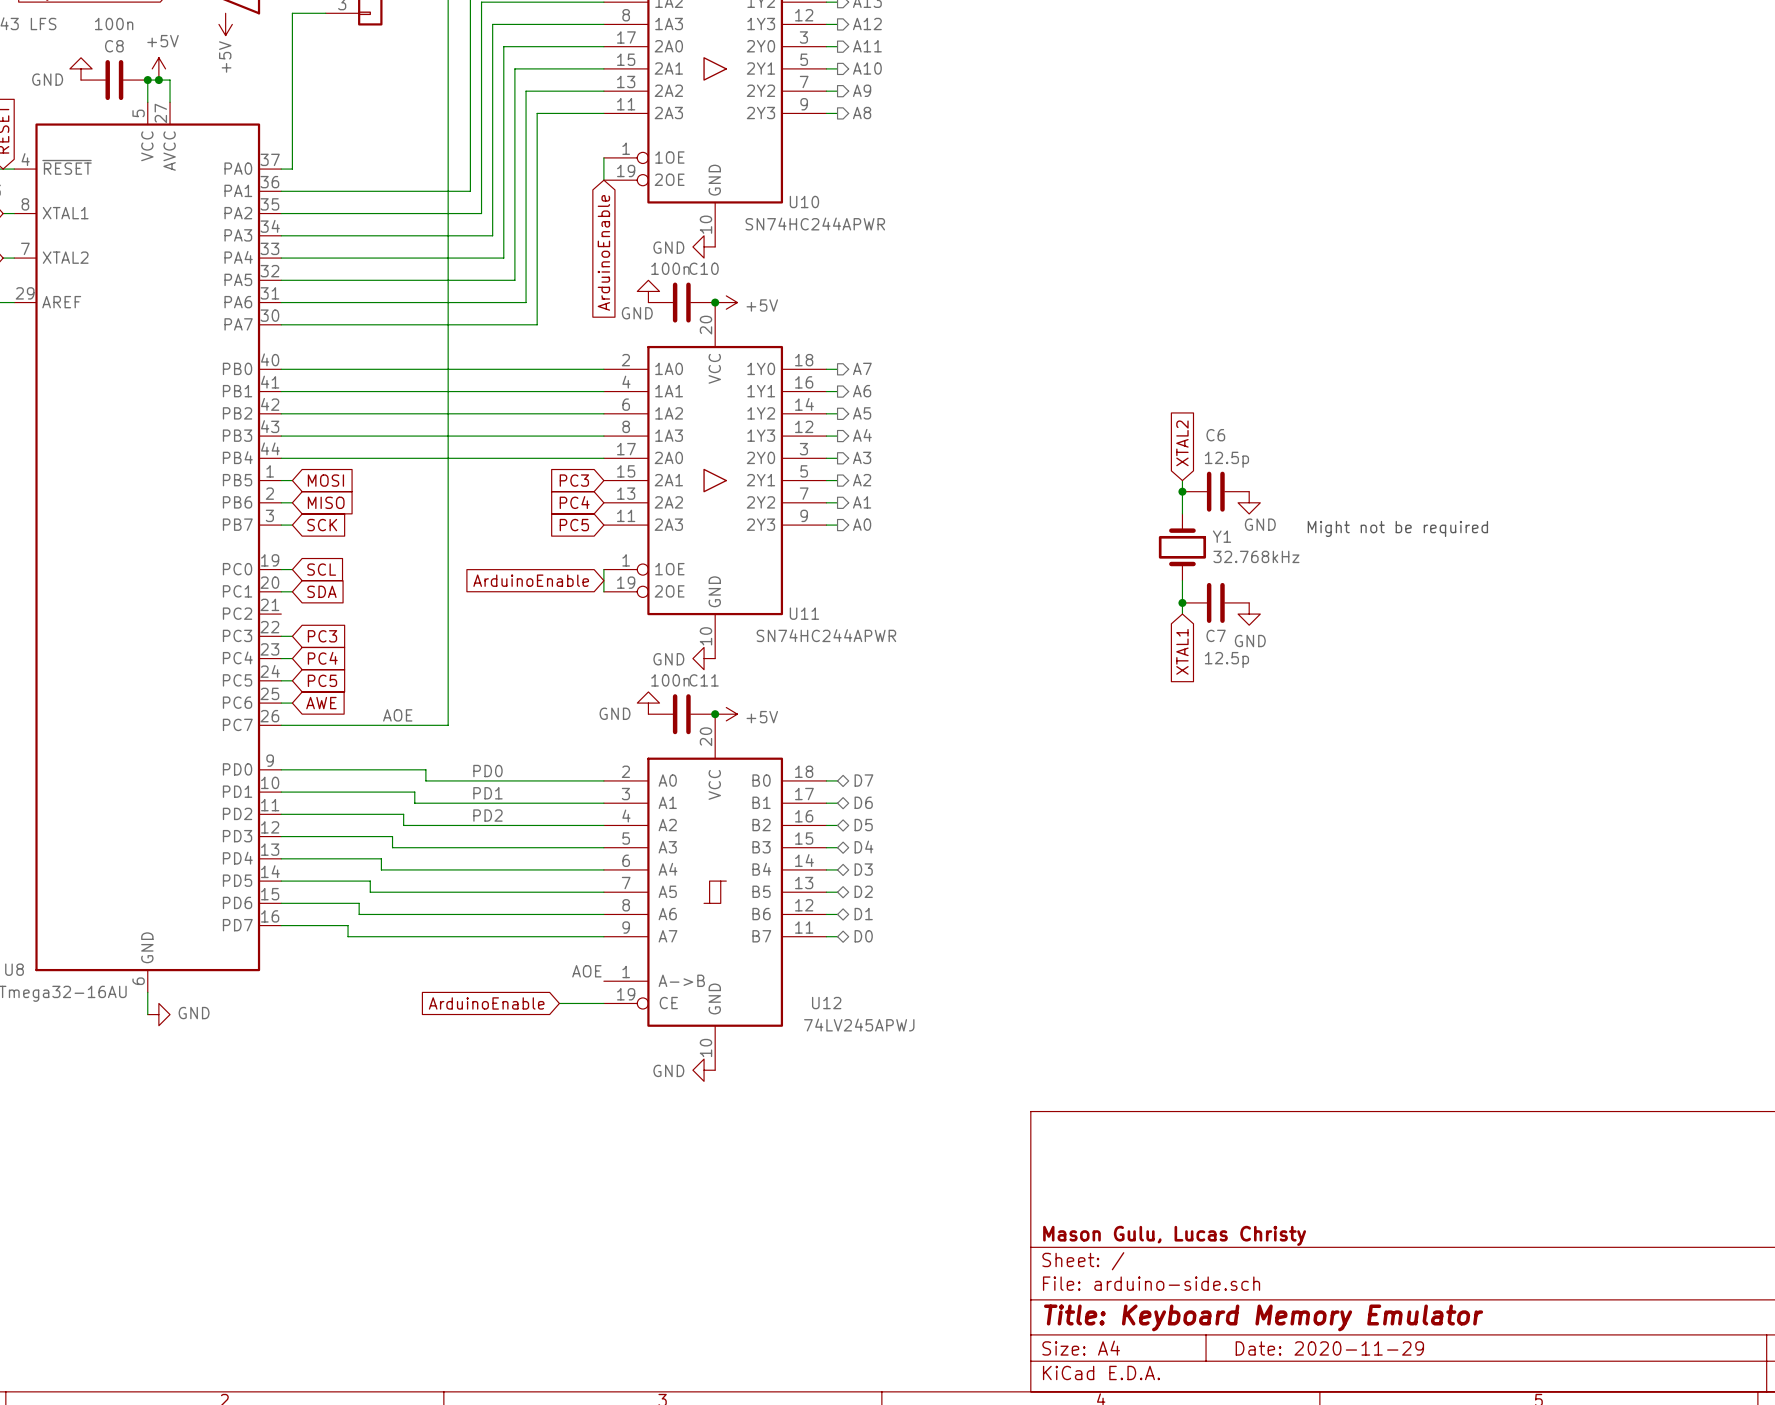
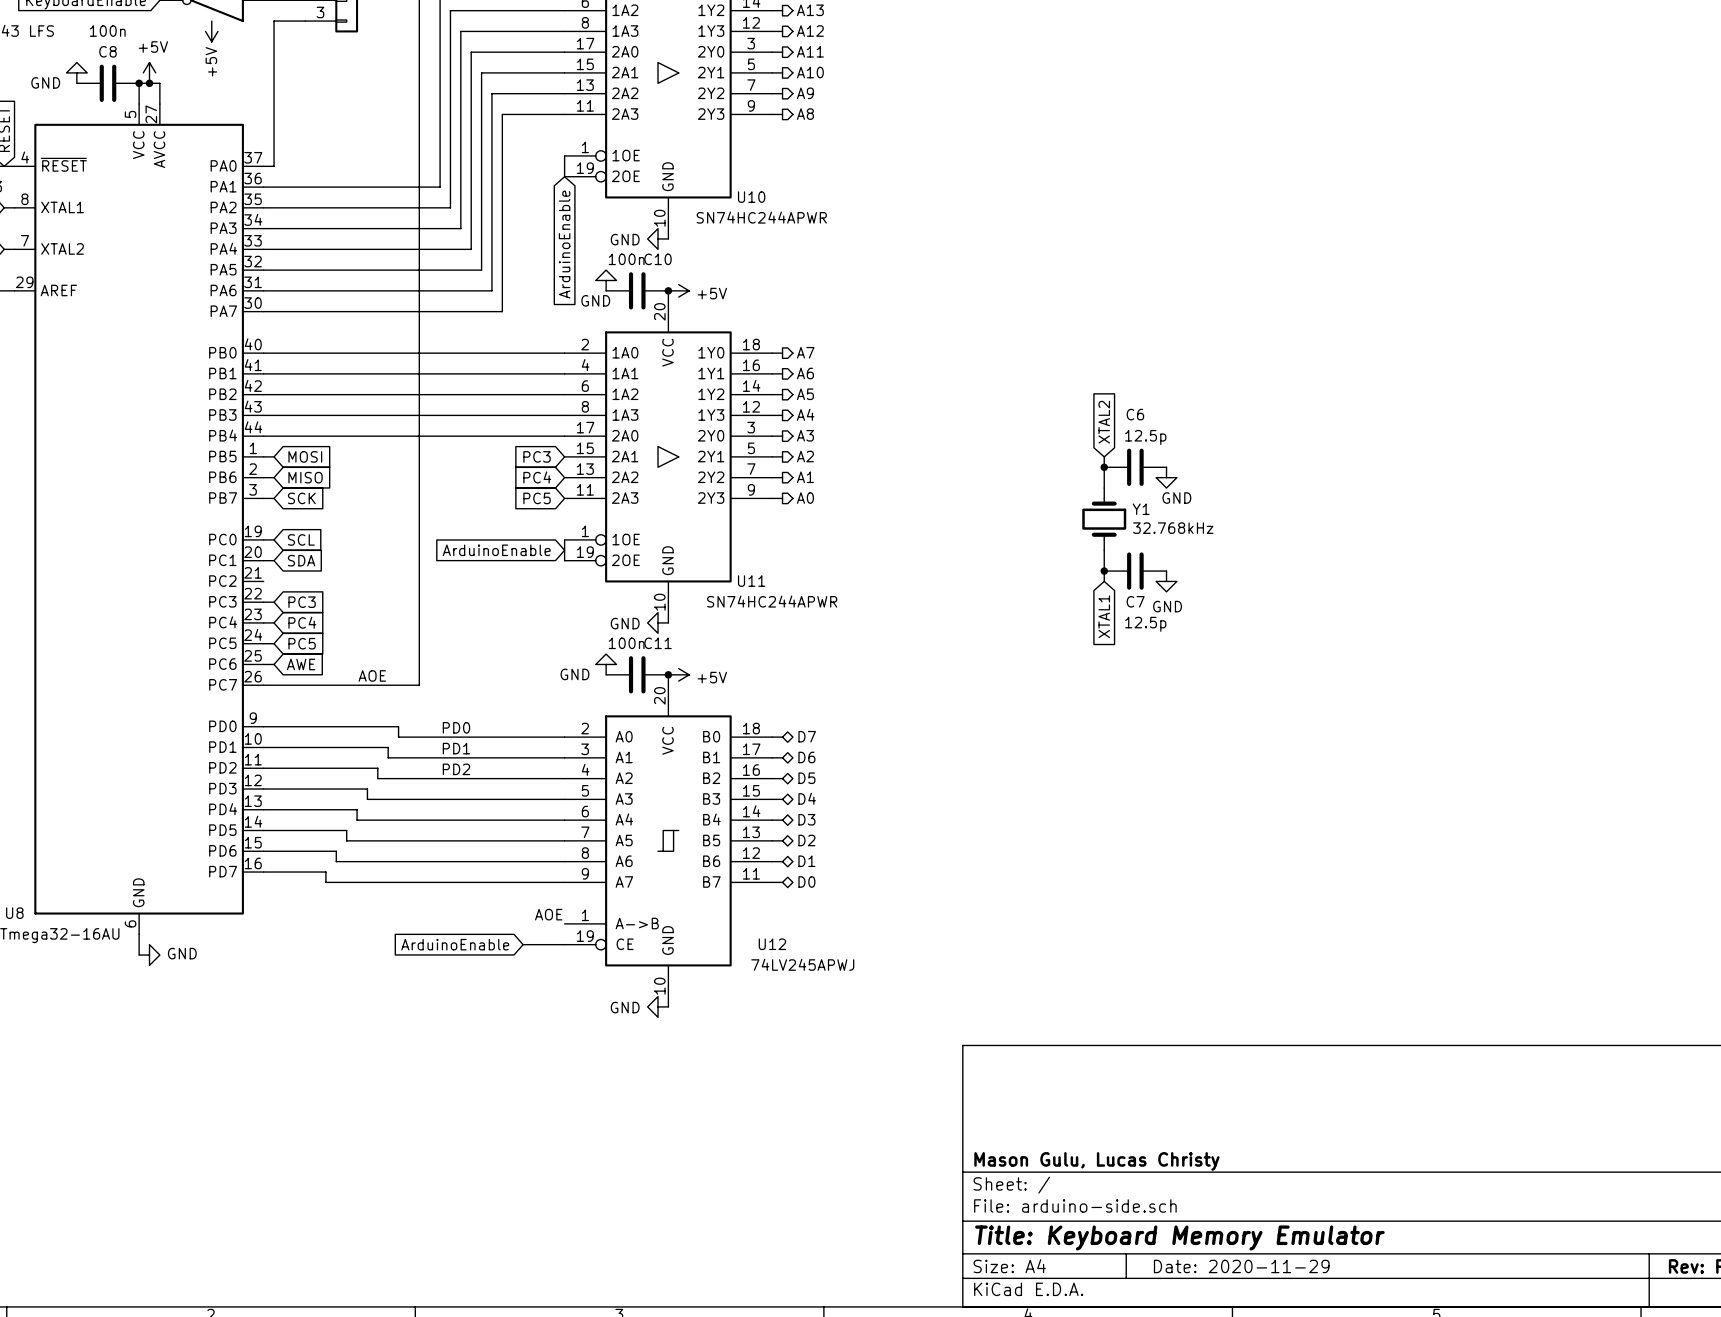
text: Might not be required (1397, 528) -> none

